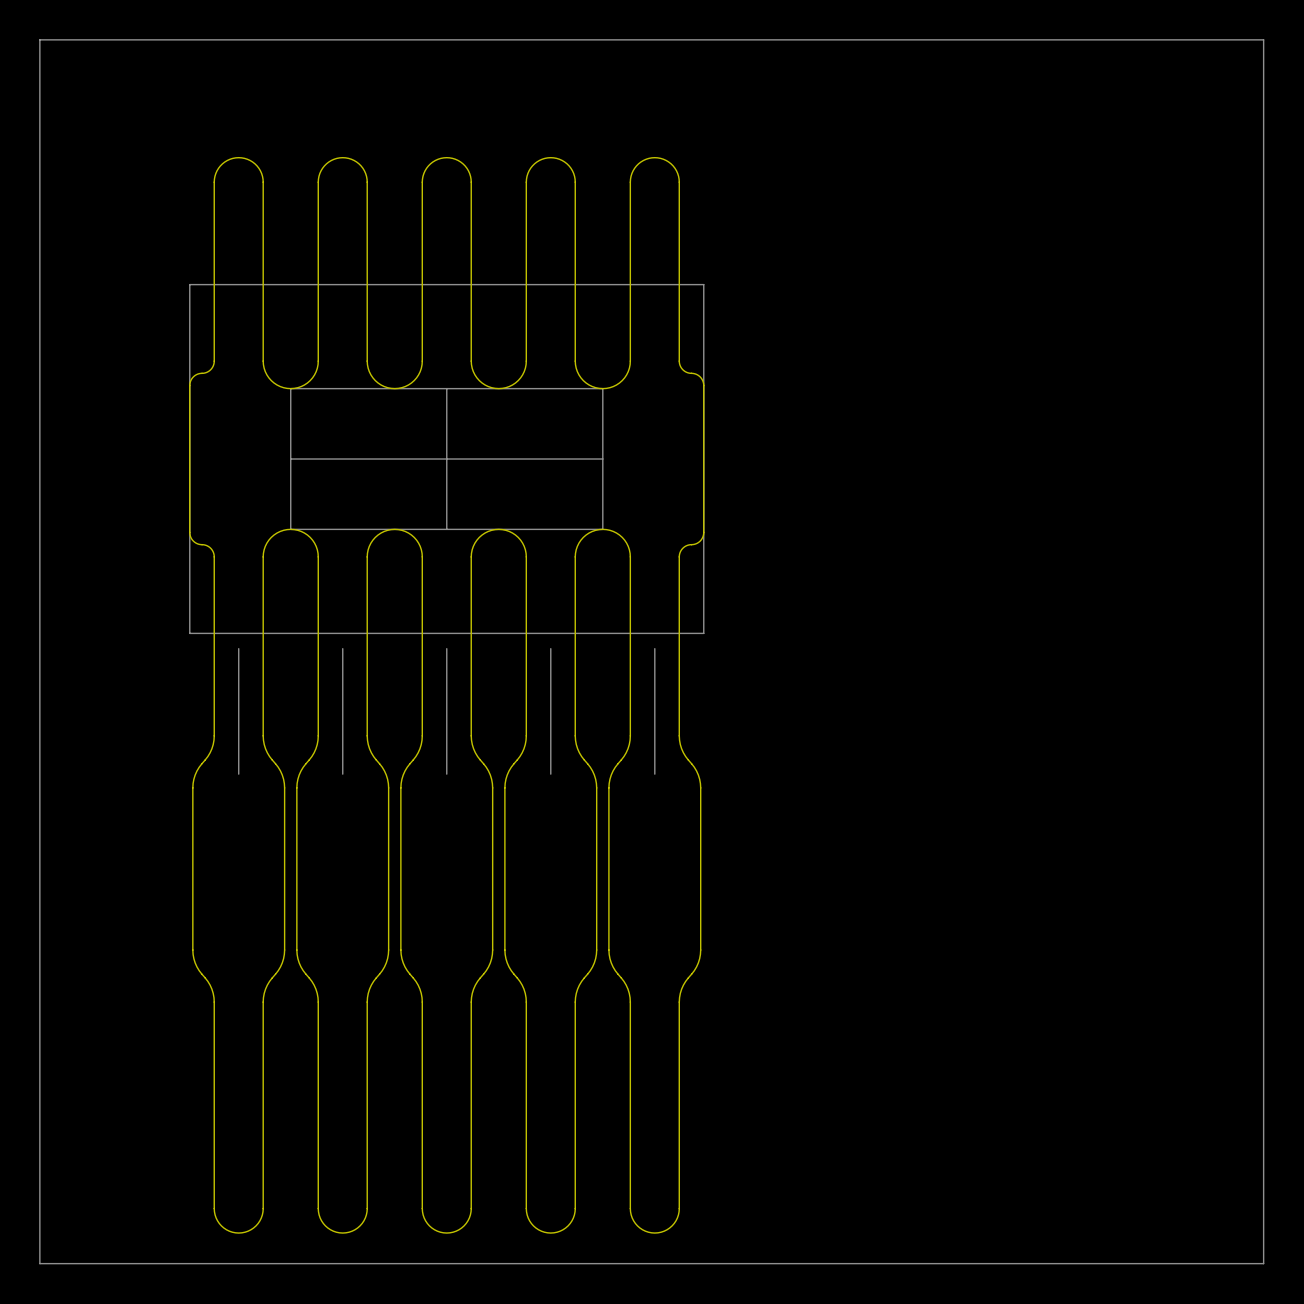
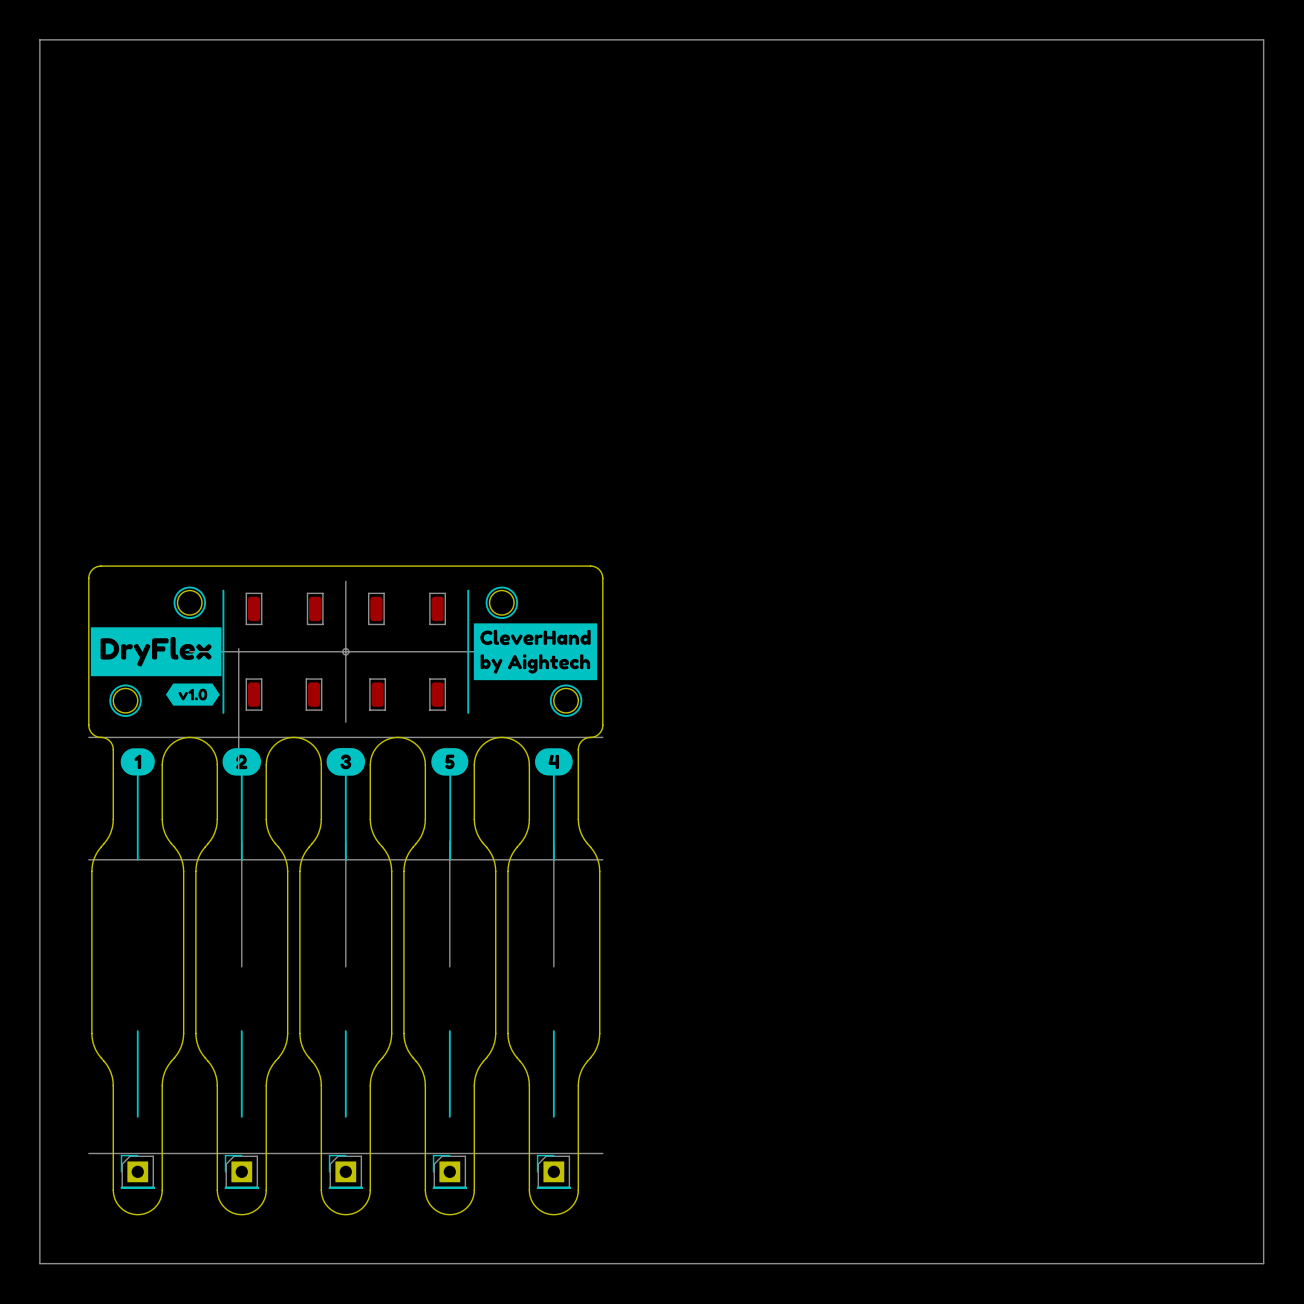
board edge: (214, 182) (214, 362) (208, 371) (193, 376) (189, 384) (189, 532) (194, 542) (210, 548) (214, 556) (214, 735) (211, 748) (196, 770) (193, 783) (192, 950) (195, 962) (210, 985) (213, 997) (214, 1208) (216, 1217) (226, 1229) (241, 1232) (256, 1225) (262, 1211) (263, 997) (267, 985) (282, 962) (284, 950) (284, 783) (280, 770) (265, 748) (263, 735) (263, 556) (265, 546) (271, 537) (280, 531) (290, 529) (301, 531) (310, 537) (316, 546) (318, 556) (318, 735) (315, 748) (300, 770) (297, 783) (296, 950) (299, 962) (314, 985) (318, 997) (319, 1214) (327, 1227) (342, 1233) (352, 1231) (360, 1225) (367, 1211) (367, 997) (371, 985) (386, 962) (388, 950) (388, 783) (384, 770) (369, 748) (367, 735) (367, 556) (369, 546) (375, 537) (384, 531) (394, 529) (405, 531) (414, 537) (420, 546) (422, 556) (422, 735) (419, 748) (405, 770) (401, 783) (400, 950) (403, 962) (418, 985) (422, 997) (422, 1211) (429, 1225) (443, 1232) (459, 1229) (469, 1217) (471, 1208) (471, 997) (475, 985) (490, 962) (492, 950) (492, 783) (488, 770) (473, 748) (471, 735) (471, 556) (473, 546) (479, 537) (488, 531) (498, 529) (509, 531) (518, 537) (524, 546) (526, 556) (526, 735) (523, 748) (509, 770) (505, 783) (504, 950) (507, 962) (522, 985) (526, 997) (526, 1211) (533, 1225) (544, 1232) (560, 1231) (571, 1220) (575, 1208) (575, 997) (579, 985) (594, 962) (596, 950) (596, 783) (592, 770) (577, 748) (575, 735) (575, 556) (577, 546) (583, 537) (592, 531) (602, 529) (613, 531) (622, 537) (628, 546) (630, 556) (630, 735) (627, 748) (613, 770) (609, 783) (608, 950) (611, 962) (626, 985) (630, 997) (630, 1211) (633, 1220) (642, 1229) (654, 1233) (664, 1231) (674, 1223) (679, 1211) (679, 997) (683, 985) (698, 962) (700, 950) (700, 783) (696, 770) (681, 748) (679, 735) (679, 556) (682, 548) (698, 542) (703, 533) (703, 385) (700, 376) (685, 371) (679, 362) (679, 182) (677, 173) (668, 162) (654, 157) (640, 162) (631, 173) (630, 182) (630, 364) (626, 374) (619, 382) (602, 388) (586, 382) (578, 374) (575, 364) (575, 179) (570, 168) (562, 160) (553, 157) (542, 159) (532, 165) (527, 176) (526, 364) (522, 374) (515, 382) (498, 388) (482, 382) (474, 374) (471, 364) (471, 182) (468, 170) (460, 162) (449, 157) (438, 159) (428, 165) (423, 176) (422, 364) (414, 380) (398, 388) (387, 387) (377, 382) (370, 374) (367, 364) (367, 182) (365, 173) (361, 165) (348, 158) (336, 158) (324, 165) (318, 176) (318, 364) (310, 380) (294, 388) (283, 387) (273, 382) (266, 374) (263, 364) (263, 182) (261, 173) (257, 165) (250, 160) (235, 157) (227, 160) (220, 165) (215, 173) (214, 182) -> none
line: (189, 284) (703, 284) (703, 633) (189, 633) (189, 284) -> none
line: (290, 388) (602, 388) (602, 529) (290, 529) (290, 388) -> none
line: (446, 388) (446, 529) -> (345, 581) (345, 722)
line: (290, 459) (602, 459) -> (189, 651) (501, 651)
board edge: none -> (101, 566) (590, 566) (600, 570) (602, 578) (602, 726) (597, 735) (581, 741) (578, 749) (578, 823) (582, 836) (595, 854) (599, 867) (599, 1033) (597, 1046) (582, 1068) (578, 1081) (578, 1193) (575, 1202) (568, 1209) (557, 1214) (544, 1212) (534, 1205) (529, 1193) (529, 1081) (525, 1068) (510, 1046) (507, 1033) (508, 867) (512, 854) (522, 840) (528, 828) (529, 764) (527, 754) (521, 745) (512, 739) (501, 737) (485, 743) (477, 751) (474, 761) (475, 828) (480, 840) (491, 854) (495, 867) (495, 1033) (493, 1046) (478, 1068) (474, 1081) (474, 1190) (469, 1205) (459, 1212) (443, 1213) (432, 1207) (425, 1193) (425, 1081) (421, 1068) (406, 1046) (403, 1033) (404, 867) (408, 854) (418, 840) (424, 828) (425, 764) (423, 754) (417, 745) (408, 739) (397, 737) (381, 743) (373, 751) (370, 761) (371, 828) (376, 840) (387, 854) (391, 867) (391, 1033) (389, 1046) (374, 1068) (370, 1081) (370, 1190) (367, 1202) (355, 1212) (339, 1213) (328, 1207) (321, 1193) (321, 1081) (317, 1068) (302, 1046) (299, 1033) (300, 867) (304, 854) (314, 840) (320, 828) (321, 764) (319, 754) (313, 745) (304, 739) (293, 737) (283, 739) (274, 745) (268, 754) (266, 764) (267, 828) (272, 840) (283, 854) (287, 867) (287, 1033) (285, 1046) (270, 1068) (266, 1081) (266, 1193) (259, 1207) (244, 1214) (229, 1211) (219, 1199) (217, 1190) (217, 1081) (213, 1068) (198, 1046) (195, 1033) (196, 867) (200, 854) (210, 840) (216, 828) (217, 764) (215, 754) (209, 745) (200, 739) (189, 737) (179, 739) (170, 745) (164, 754) (162, 764) (163, 828) (168, 840) (179, 854) (183, 867) (183, 1033) (181, 1046) (166, 1068) (162, 1081) (162, 1193) (155, 1207) (144, 1213) (128, 1212) (118, 1205) (113, 1190) (113, 1081) (109, 1068) (94, 1046) (91, 1033) (92, 867) (96, 854) (110, 832) (113, 819) (112, 746) (107, 739) (92, 733) (88, 725) (88, 576) (92, 569) (101, 566)
drawing: none -> [90, 586, 222, 717]
drawing: none -> [473, 586, 598, 717]
round board edge: none -> [177, 590, 203, 616]
line: none -> (223, 590) (223, 712)
line: none -> (468, 590) (468, 712)
round board edge: none -> [489, 590, 515, 616]
part: none -> (254, 608)
part: none -> (315, 608)
part: none -> (376, 608)
part: none -> (437, 608)
line: (342, 648) (342, 774) -> (241, 841) (241, 966)
drawing: none -> [342, 648, 350, 656]
line: (446, 648) (446, 774) -> (345, 841) (345, 966)
line: (550, 648) (550, 774) -> (449, 841) (449, 966)
line: (654, 648) (654, 774) -> (553, 841) (553, 966)
round board edge: none -> [113, 688, 139, 714]
round board edge: none -> [553, 688, 579, 714]
part: none -> (254, 694)
part: none -> (313, 694)
part: none -> (377, 694)
part: none -> (437, 694)
line: none -> (88, 737) (602, 737)
drawing: none -> [120, 748, 155, 776]
drawing: none -> [222, 748, 262, 776]
drawing: none -> [326, 748, 366, 776]
drawing: none -> [431, 748, 469, 776]
drawing: none -> [535, 748, 573, 776]
line: none -> (450, 773) (450, 859)
line: none -> (137, 774) (137, 859)
line: none -> (241, 774) (241, 859)
line: none -> (345, 774) (345, 859)
line: none -> (553, 774) (553, 859)
line: none -> (88, 859) (602, 859)
line: none -> (137, 1031) (137, 1116)
line: none -> (241, 1031) (241, 1116)
line: none -> (345, 1031) (345, 1116)
line: none -> (449, 1031) (449, 1116)
line: none -> (553, 1031) (553, 1116)
line: none -> (88, 1153) (602, 1153)
part: none -> (137, 1171)
part: none -> (241, 1171)
part: none -> (345, 1171)
part: none -> (449, 1171)
part: none -> (553, 1171)

